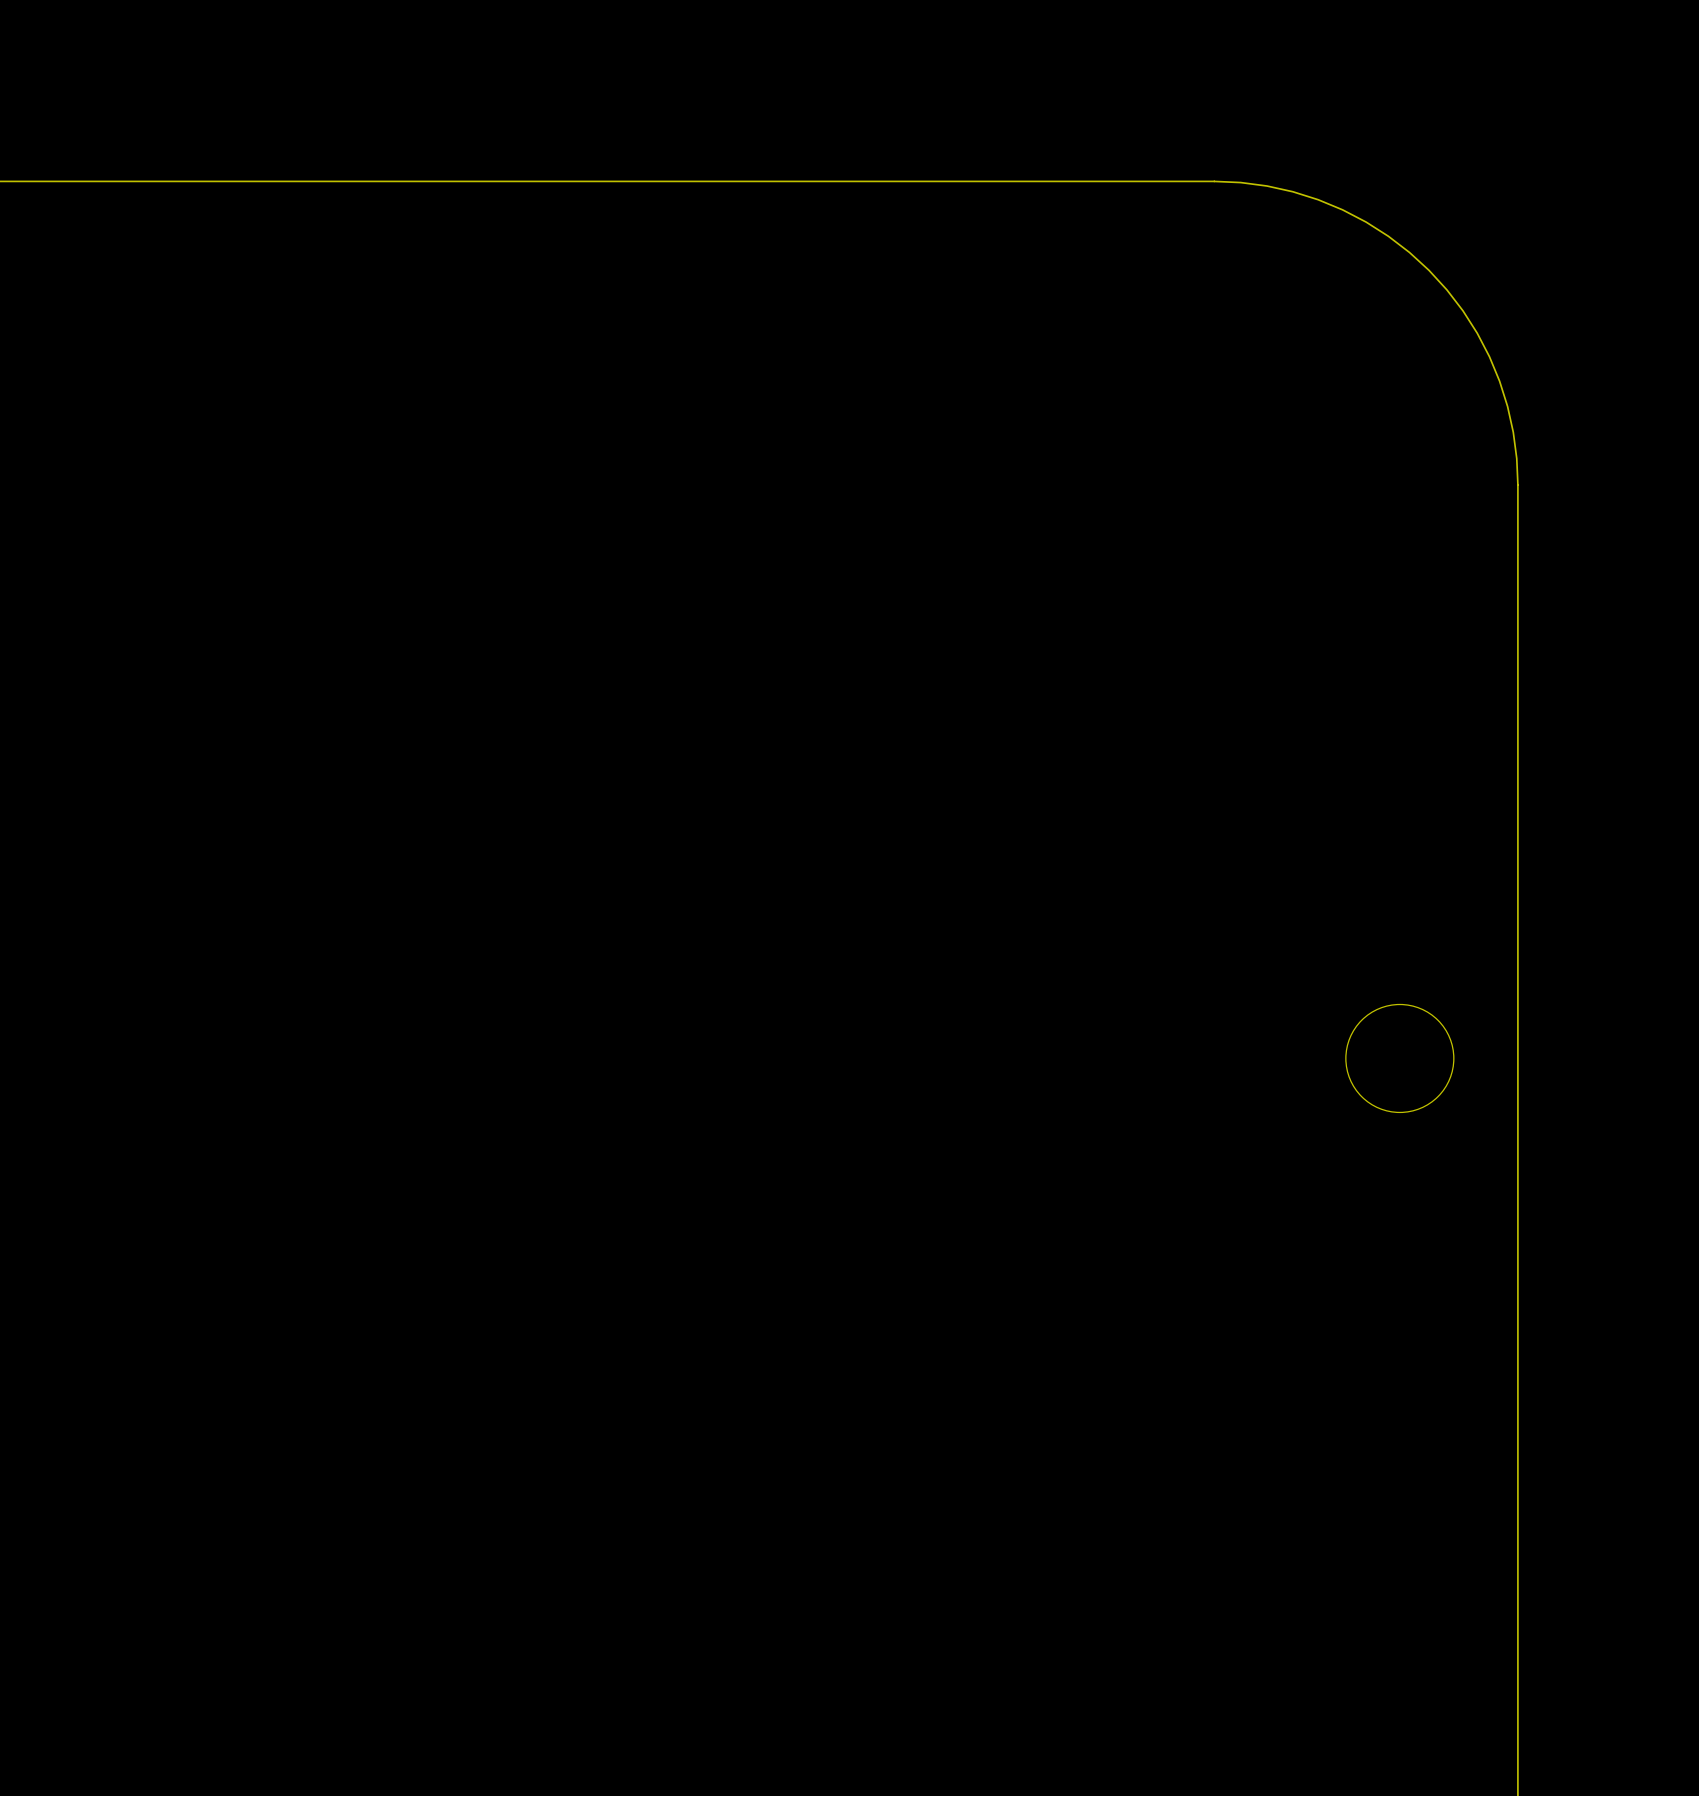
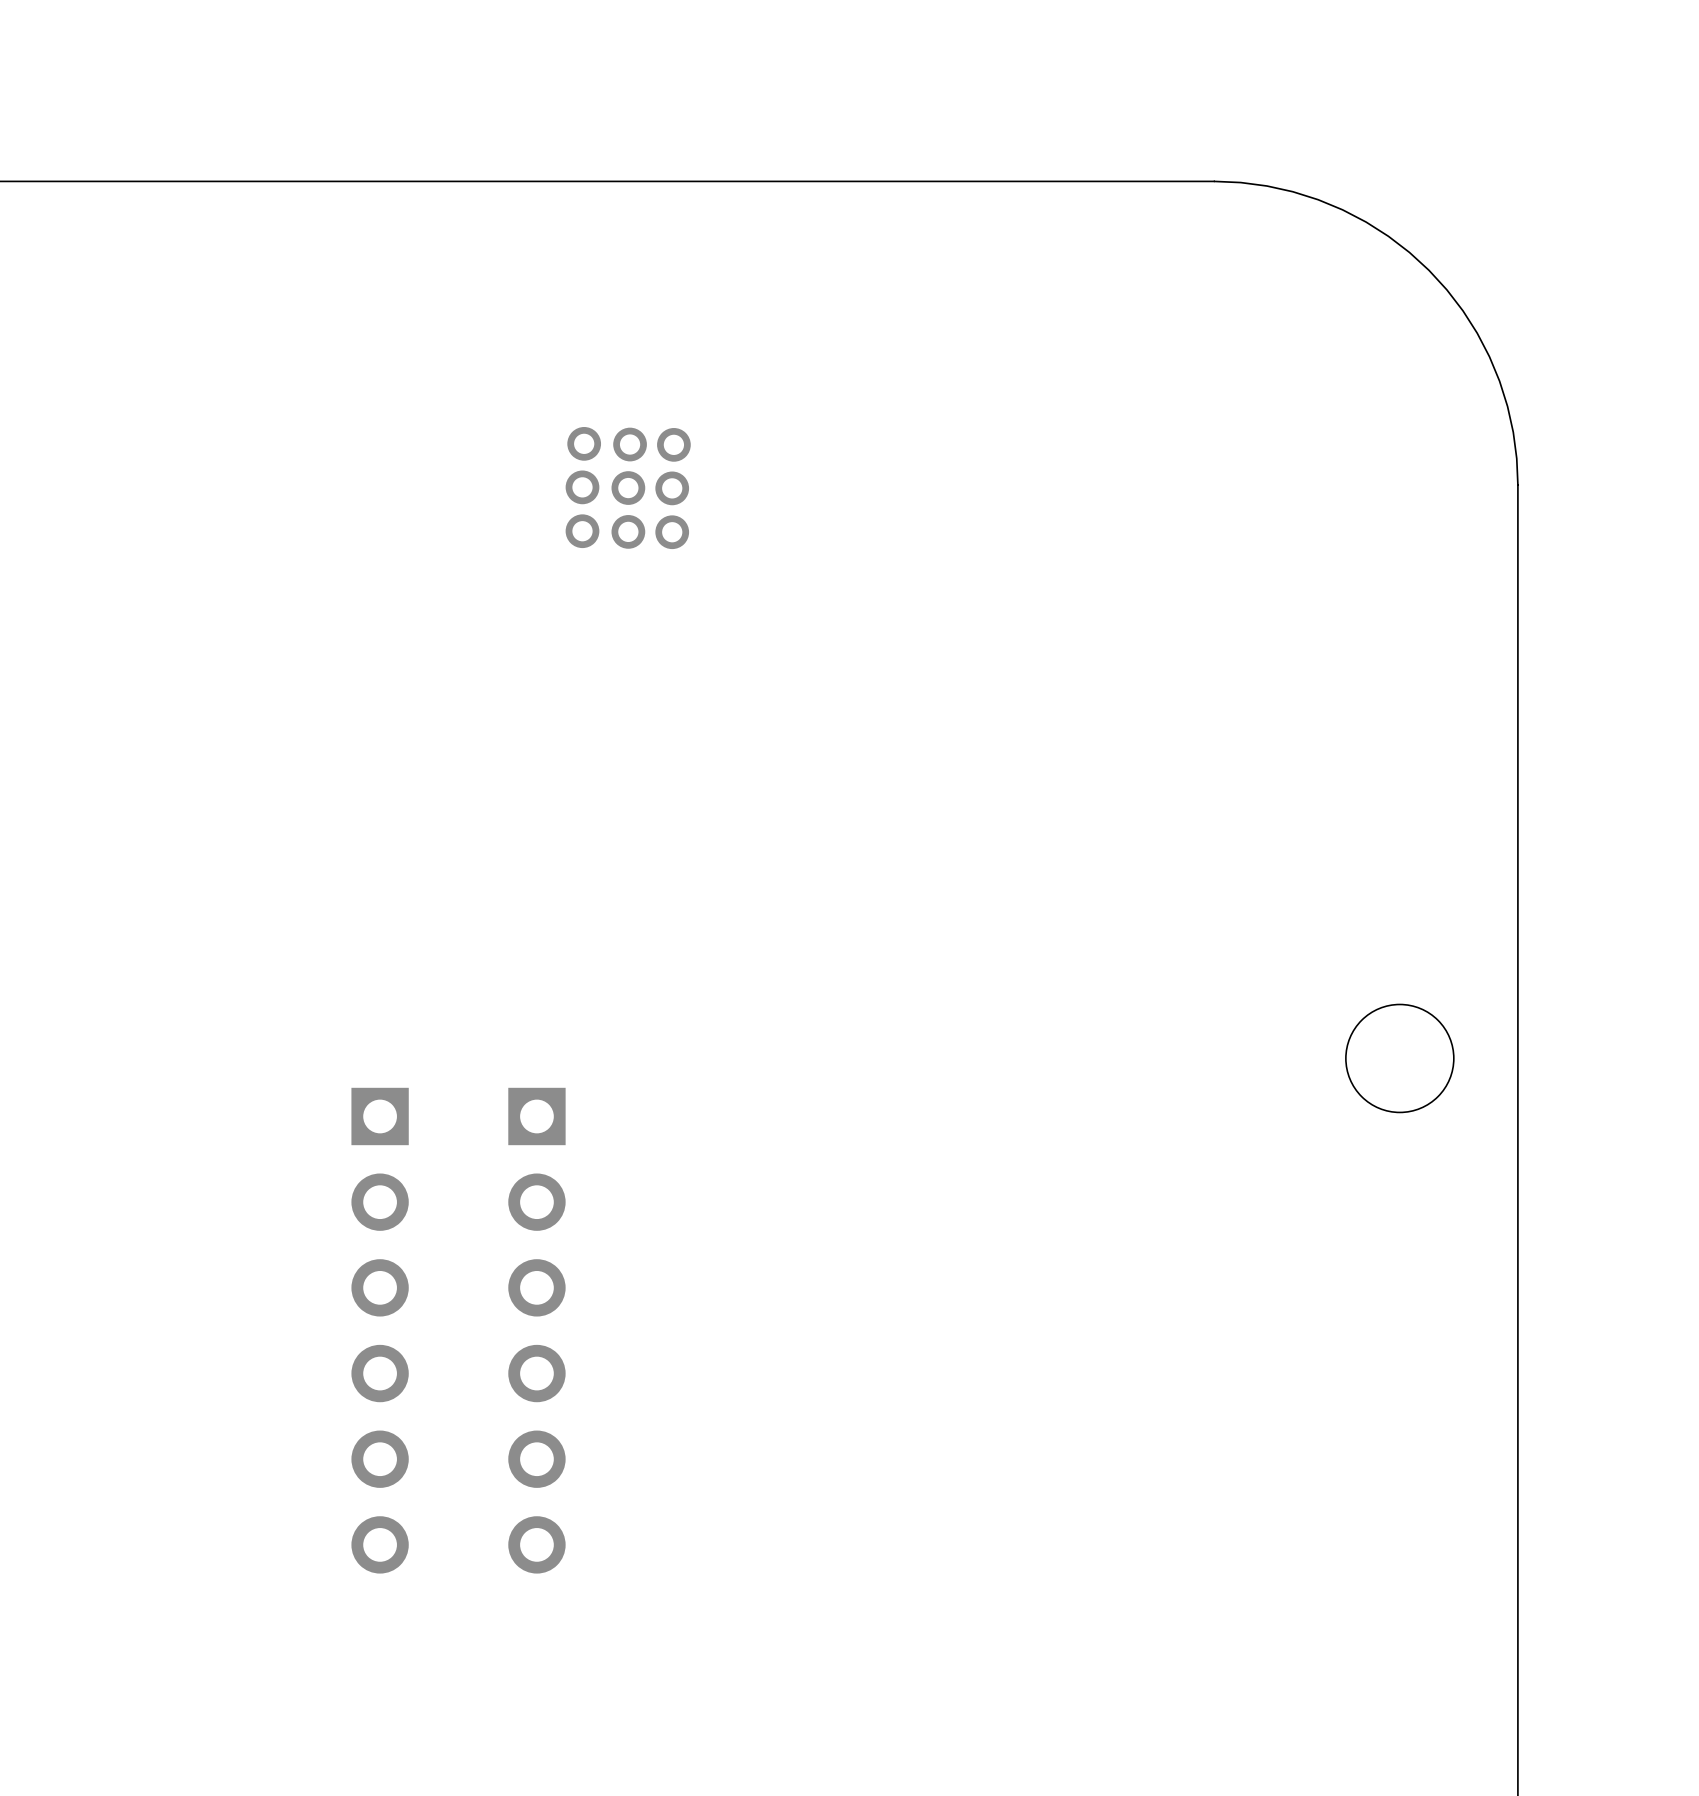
part: none -> (628, 488)
part: none -> (380, 1330)
part: none -> (536, 1330)

